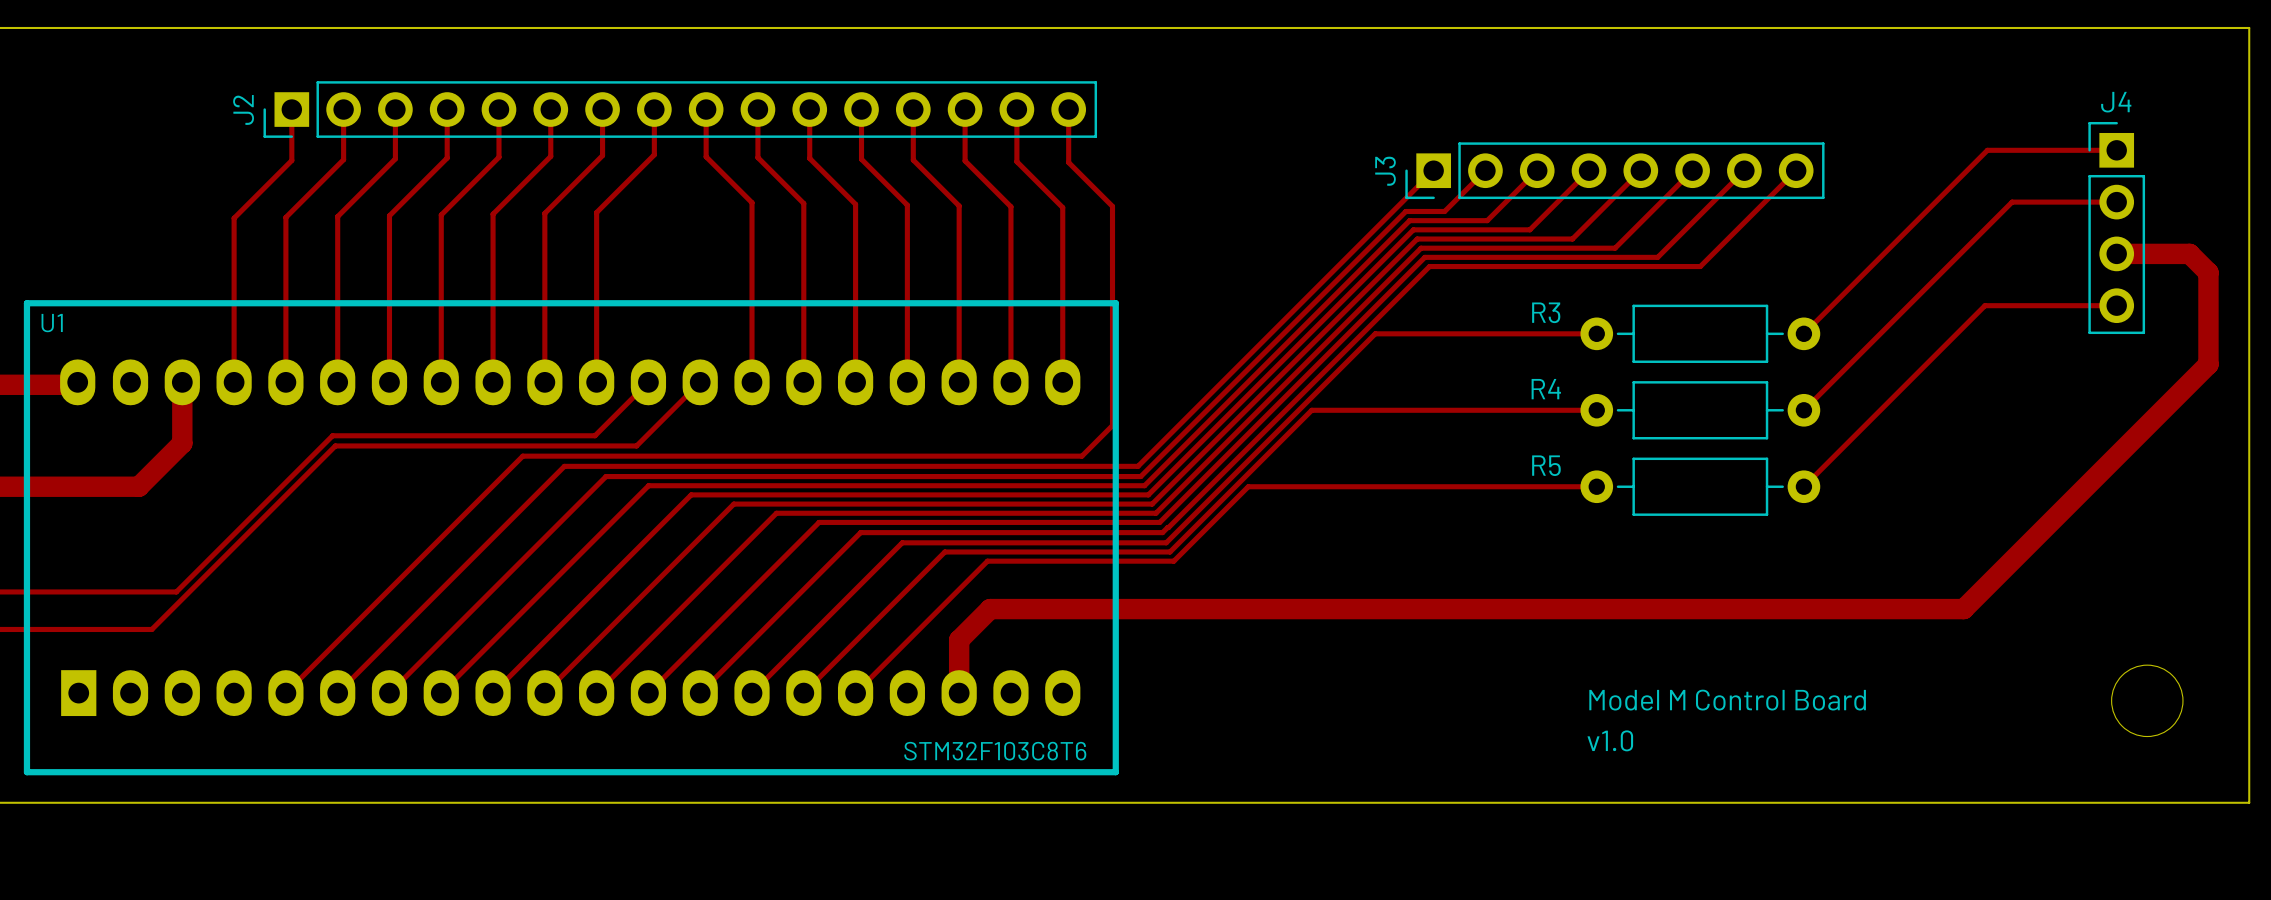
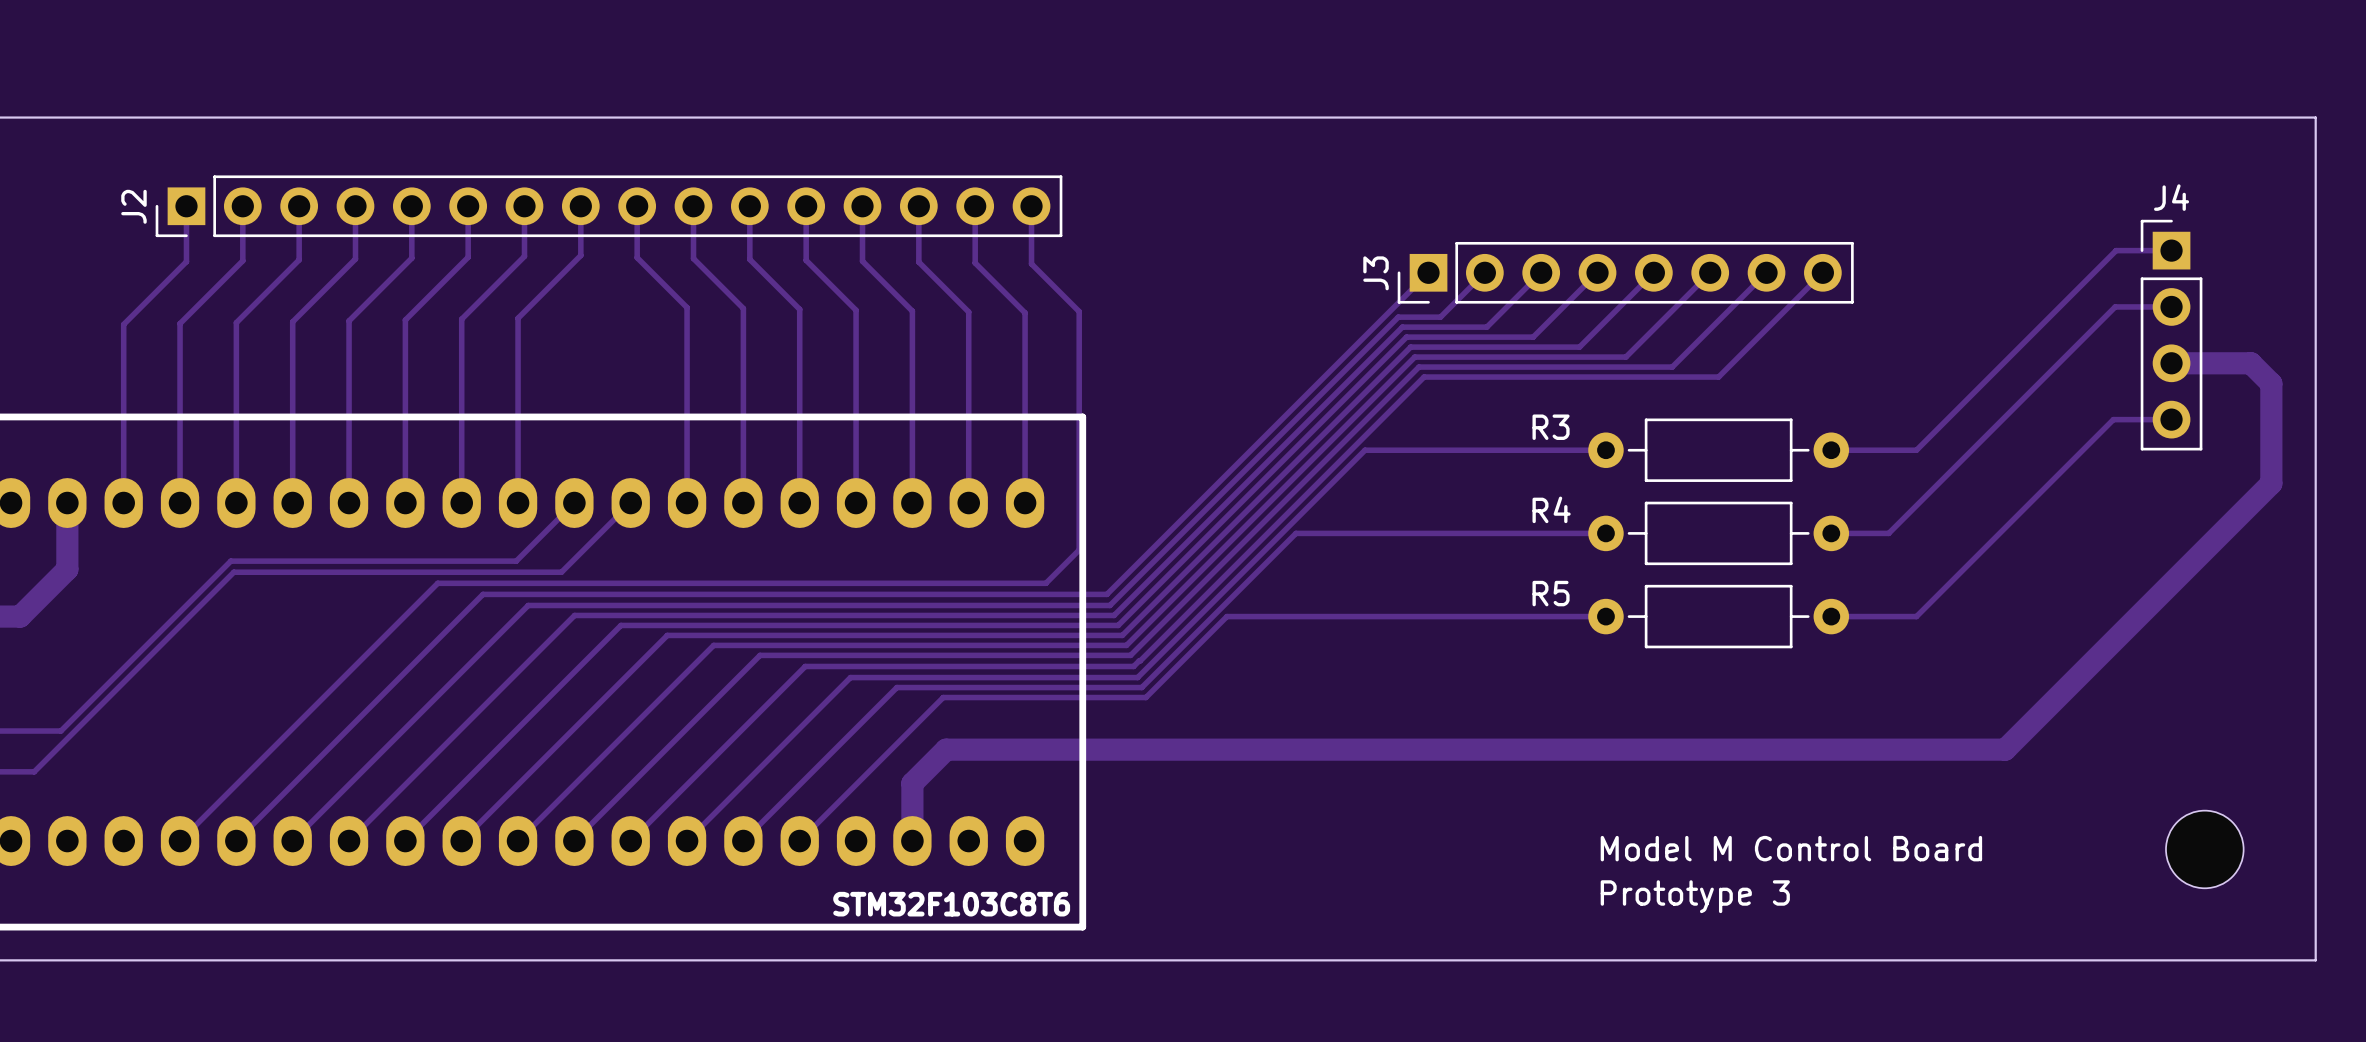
track: (2065, 150) (1987, 150) (1803, 333) -> (2116, 250) (1916, 450) (1831, 450)
track: (2064, 202) (2012, 202) (1803, 410) -> (2115, 306) (1888, 533) (1831, 533)
track: (2063, 305) (1984, 305) (1803, 486) -> (2113, 419) (1916, 616) (1831, 616)
text: v1.0 (1610, 740) -> Prototype 3 (1695, 896)

